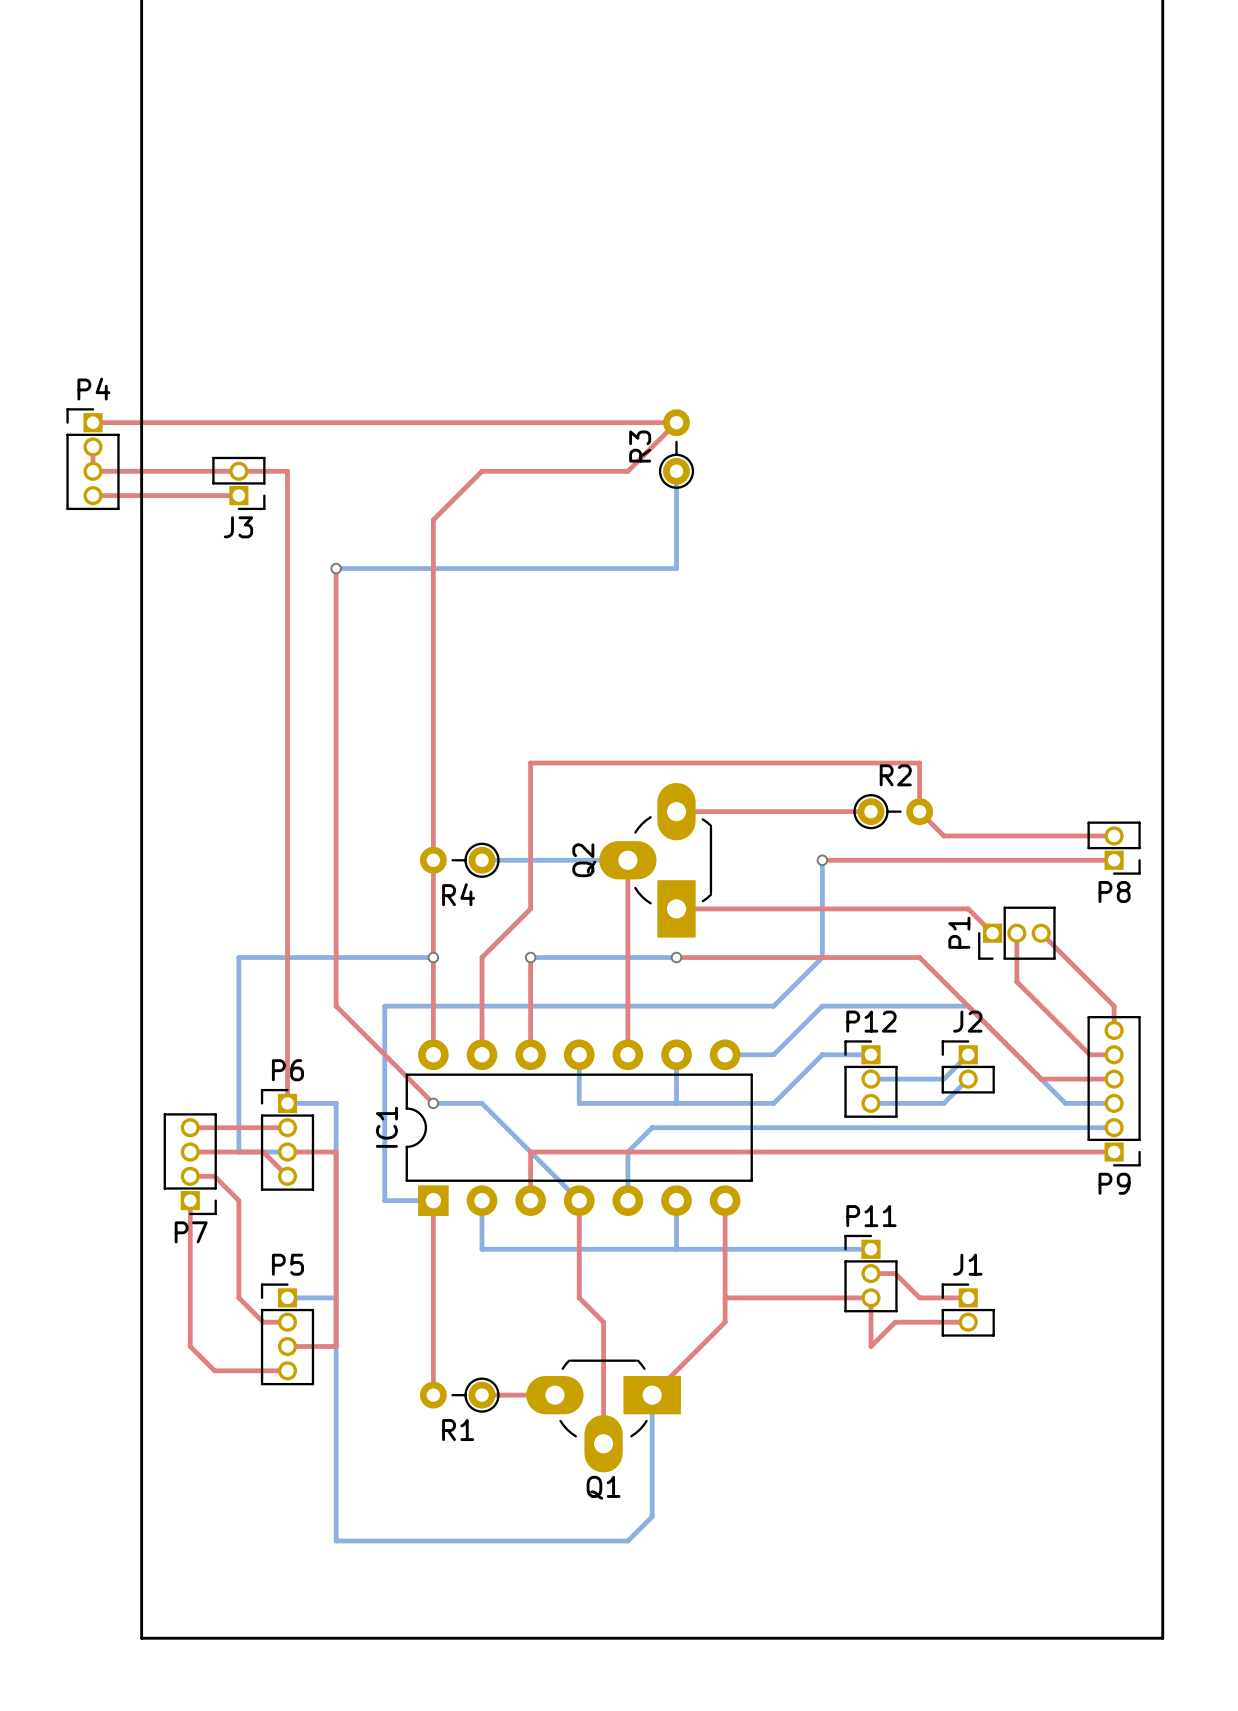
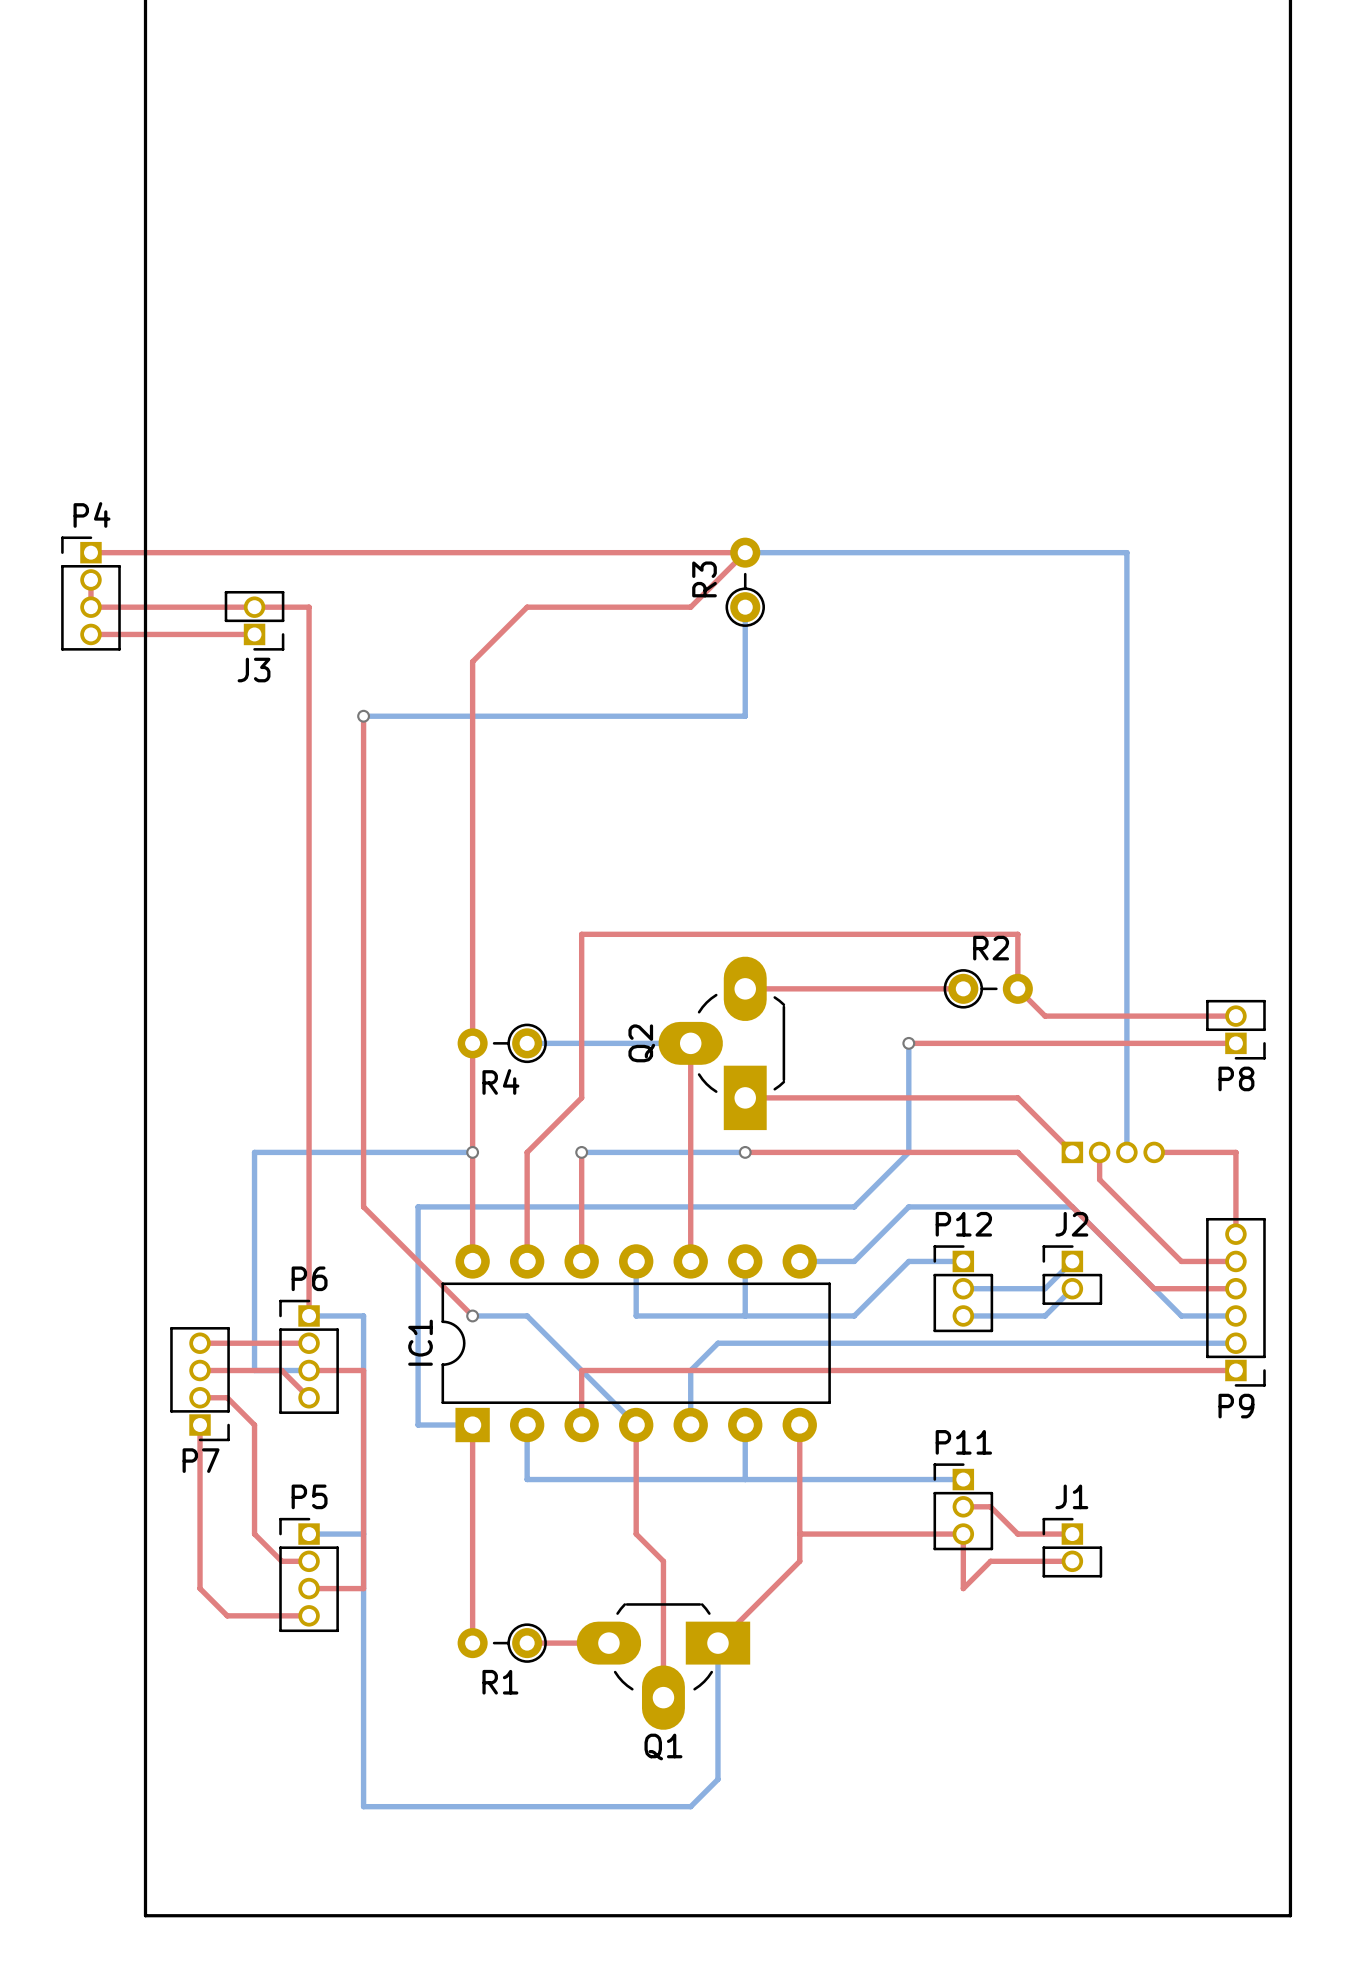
bottom track: none -> (745, 552) (1126, 552) (1126, 1152)
top track: (919, 908) (968, 908) (992, 933) -> (1017, 1097) (1072, 1152)
top track: (1016, 933) (1016, 981) (1089, 1054) -> (1099, 1152) (1099, 1179) (1181, 1261) (1208, 1261)
P1: (1016, 933) -> none
top track: (1041, 933) (1114, 1006) -> (1154, 1152) (1235, 1152) (1235, 1206)
part: none -> (1113, 1152)

